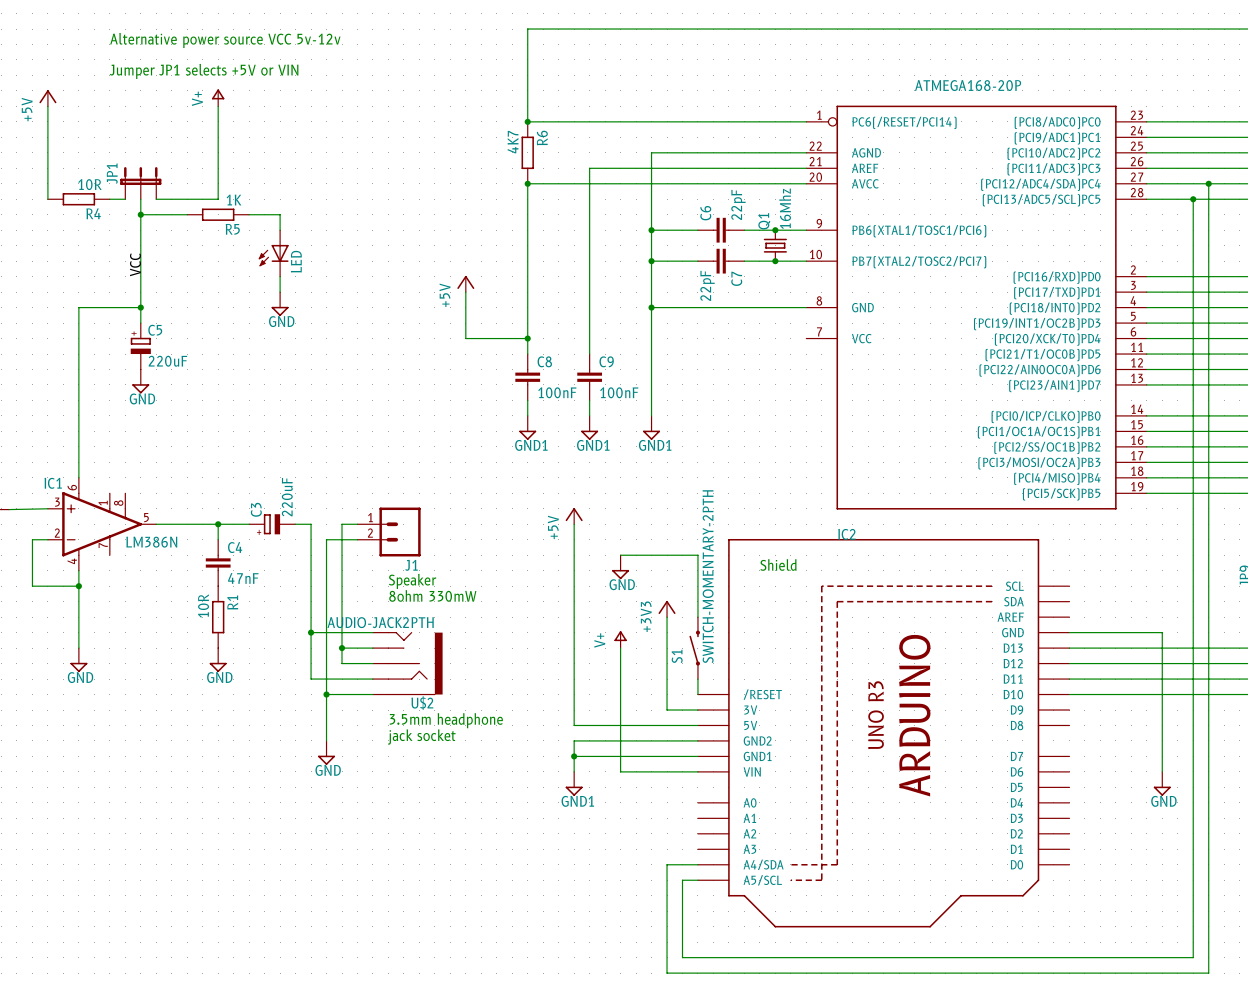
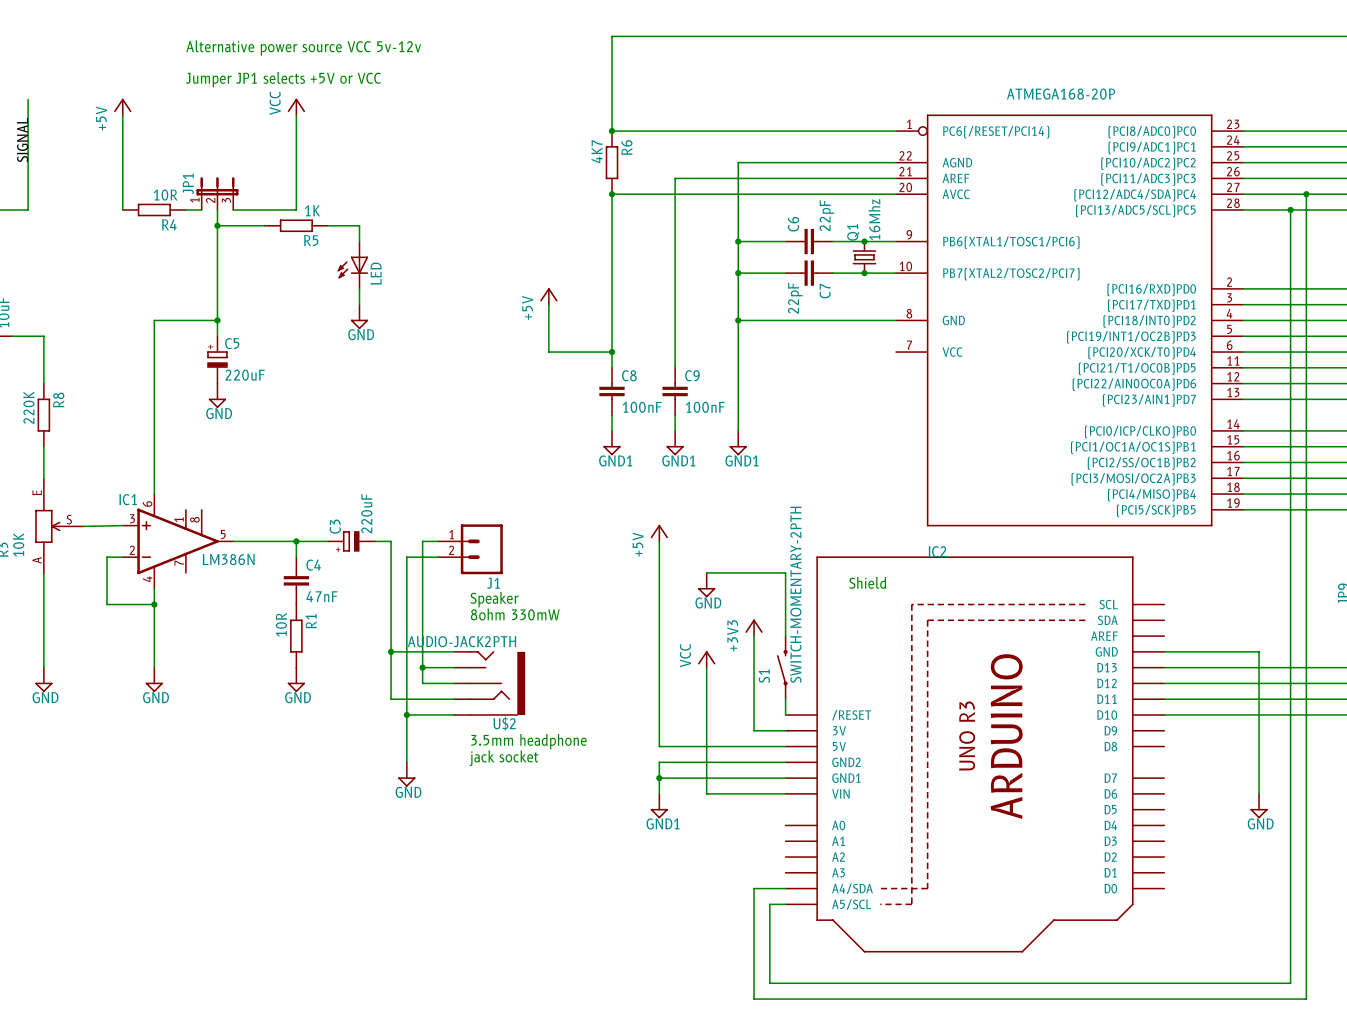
text: Jumper JP1 selects +5V or VIN (204, 71) -> Jumper JP1 selects +5V or VCC (283, 79)
power symbol: V+ (218, 97) -> VCC (296, 107)
JP1 symbol: [120, 167, 162, 200] -> [196, 177, 239, 210]
label: VCC (135, 264) -> none
power symbol: V+ (620, 639) -> VCC (706, 659)

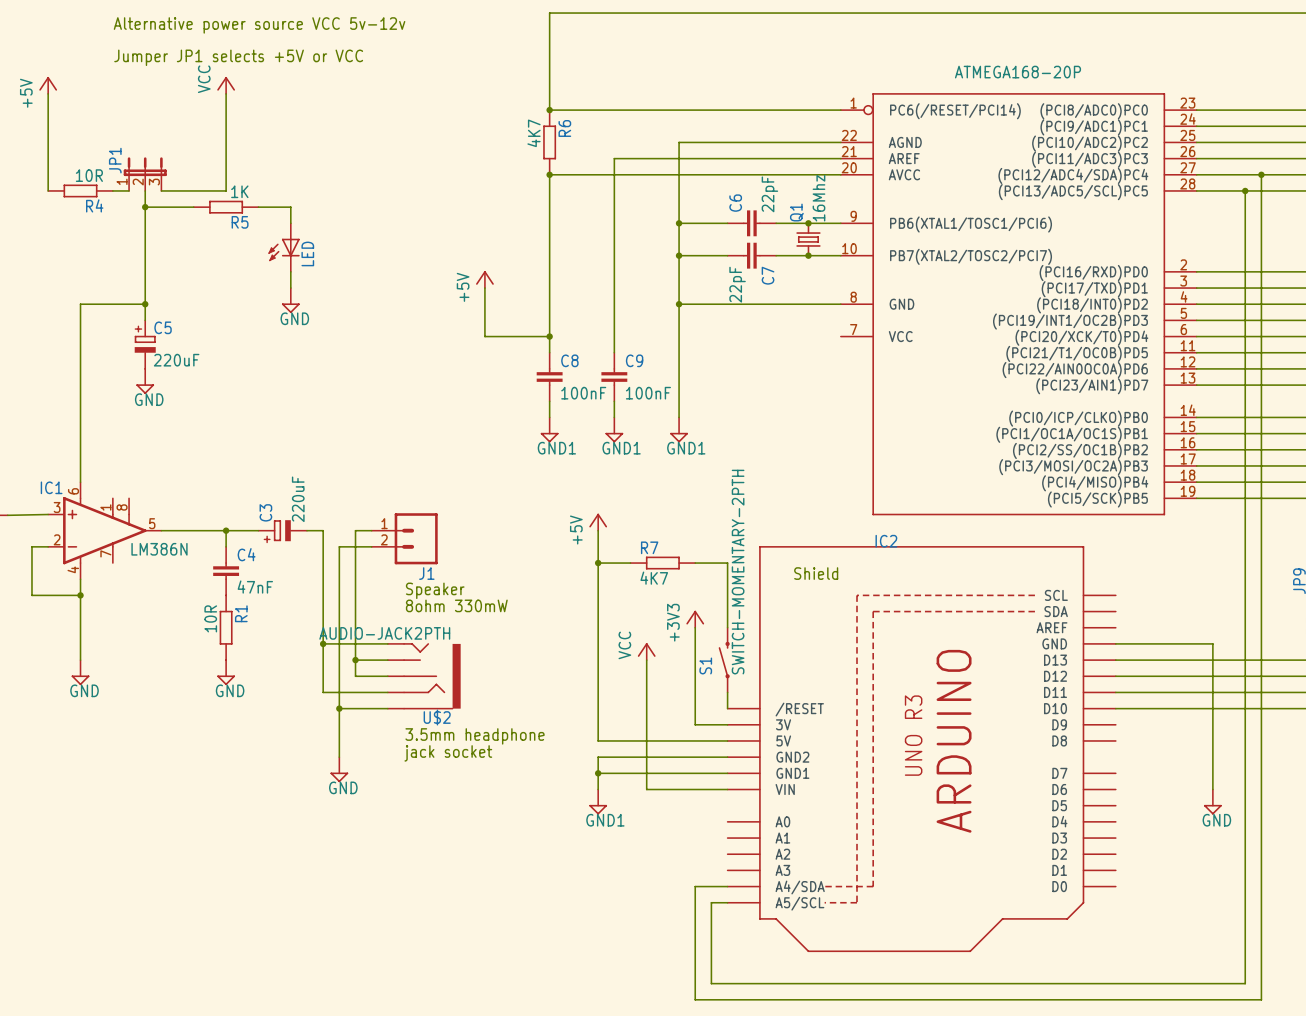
wire: none -> (598, 563) (630, 563)
junction: none -> (598, 563)
wire: (706, 572) (754, 572) -> none
R7: none -> 4K7 (662, 563)
power symbol: GND (706, 585) -> none

